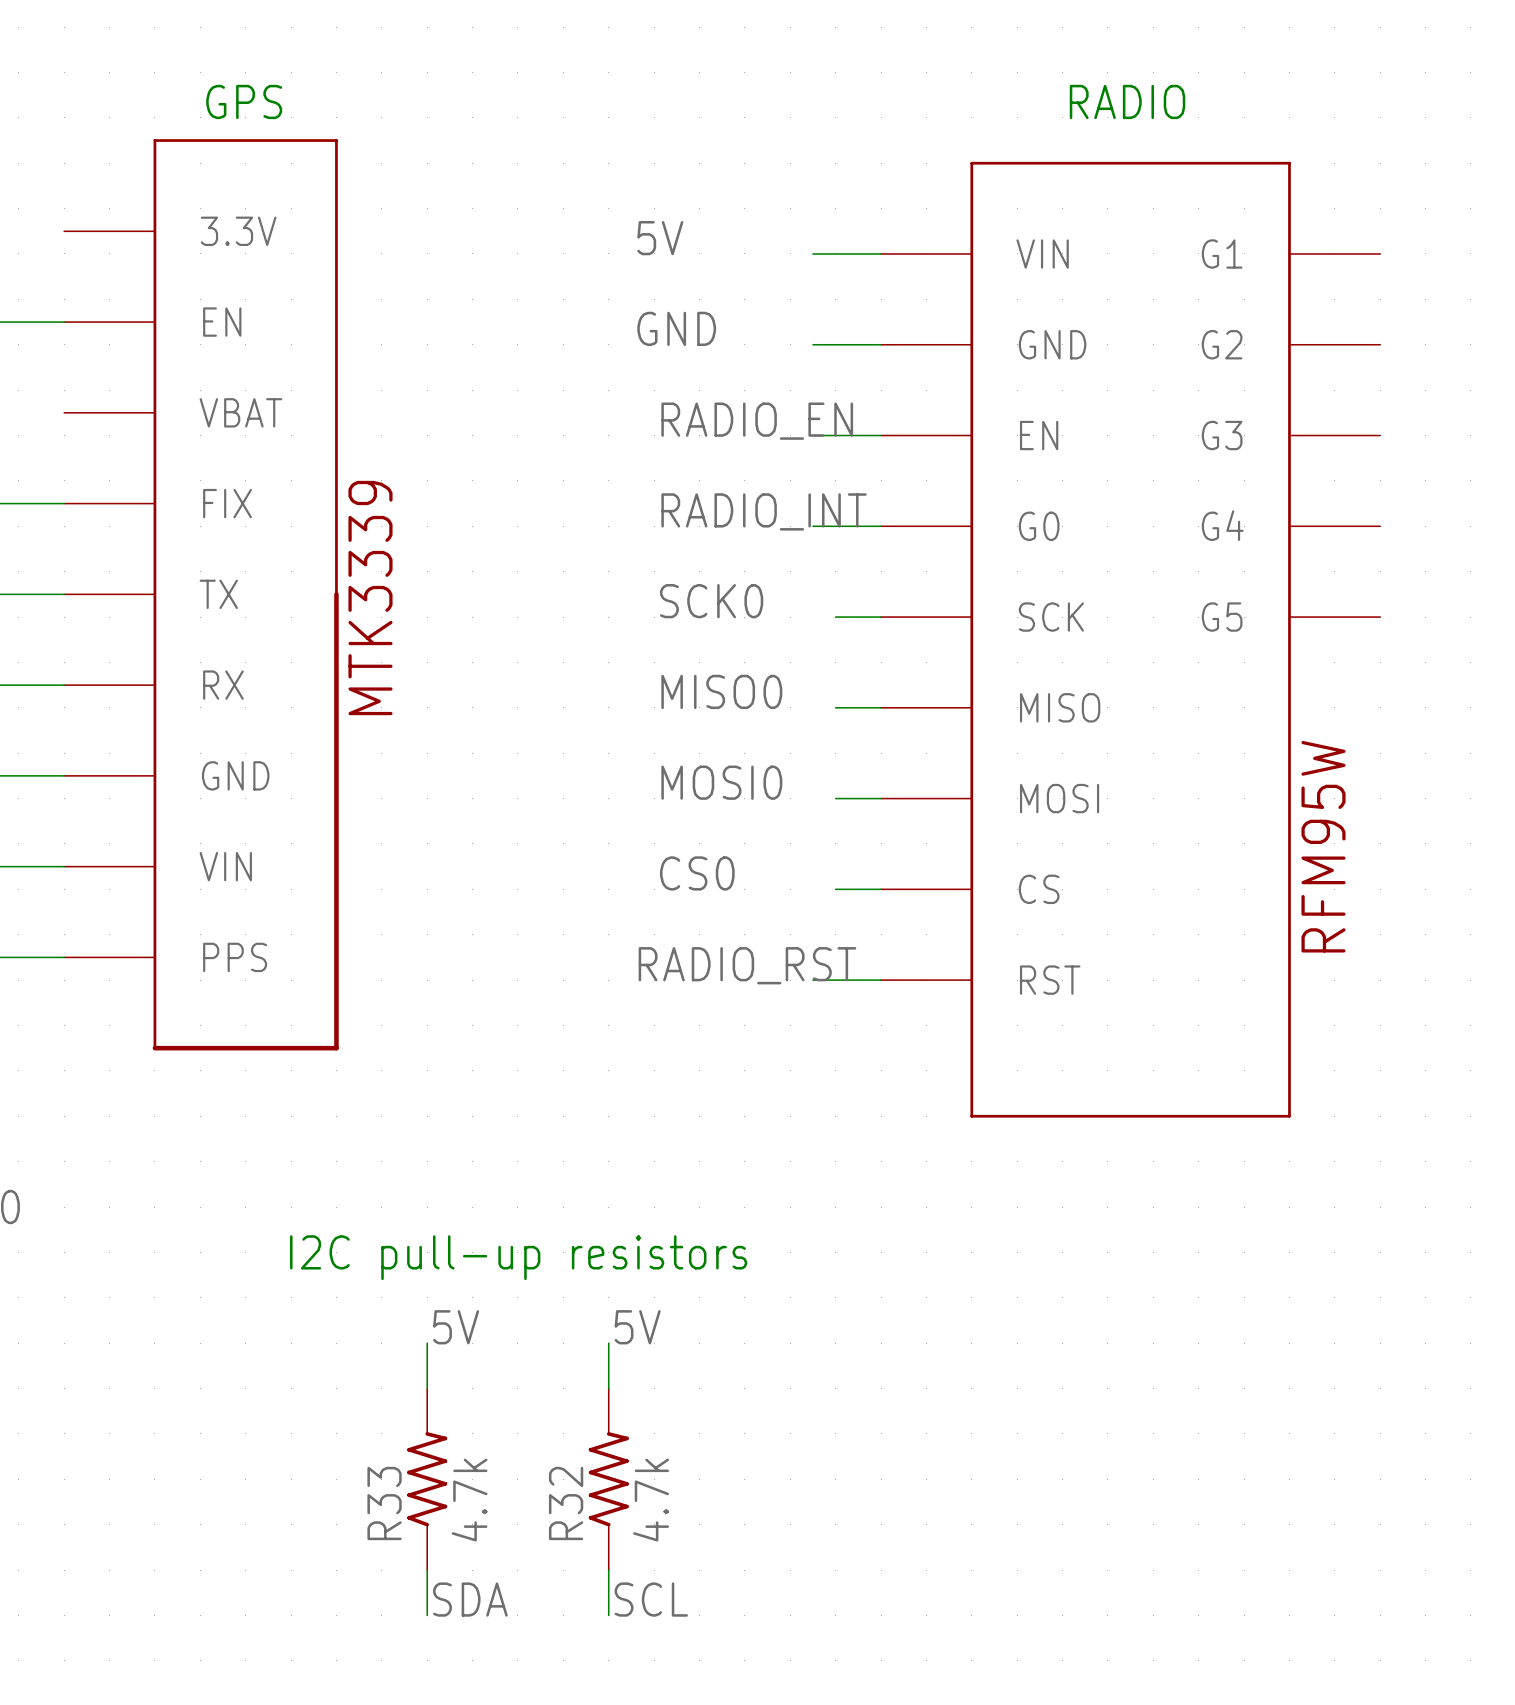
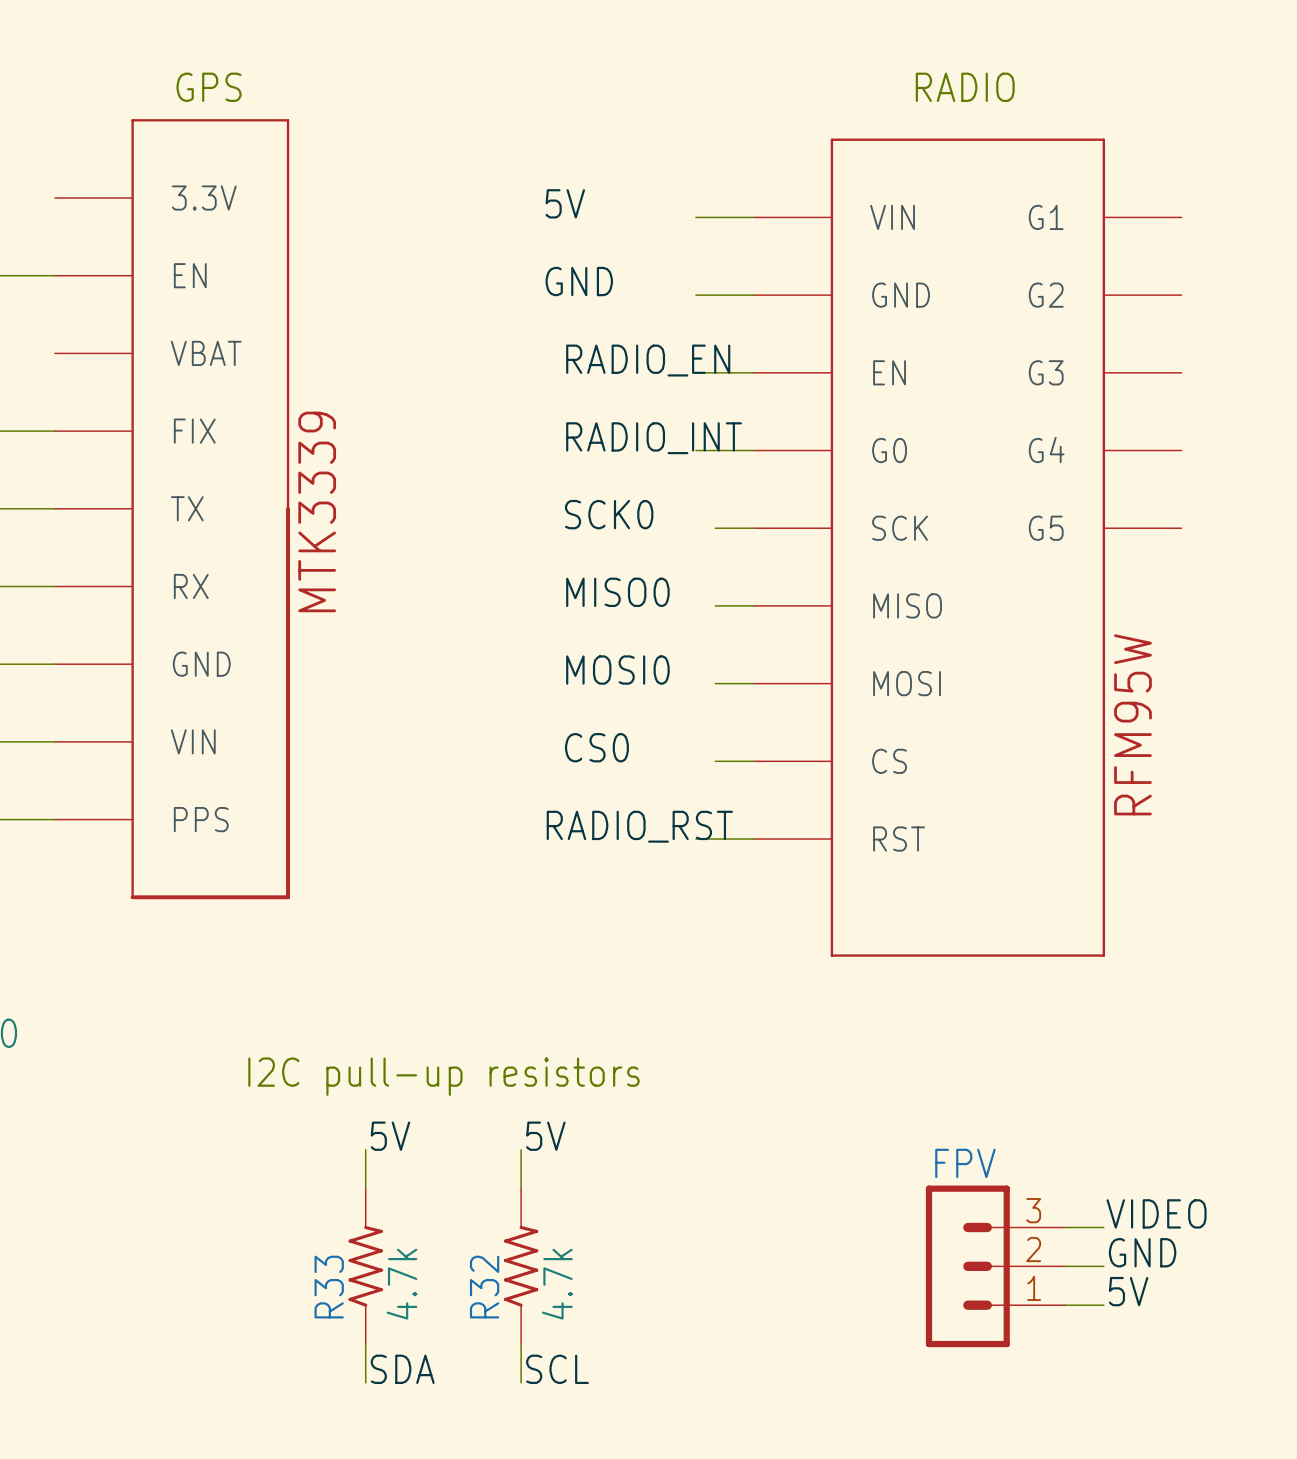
label: none -> VIDEO (1156, 1213)
wire: none -> (1065, 1227) (1103, 1227)
label: none -> GND (1142, 1252)
FPV: none -> (995, 1266)
wire: none -> (1065, 1266) (1103, 1266)
label: none -> 5V (1128, 1291)
wire: none -> (1065, 1305) (1103, 1305)

